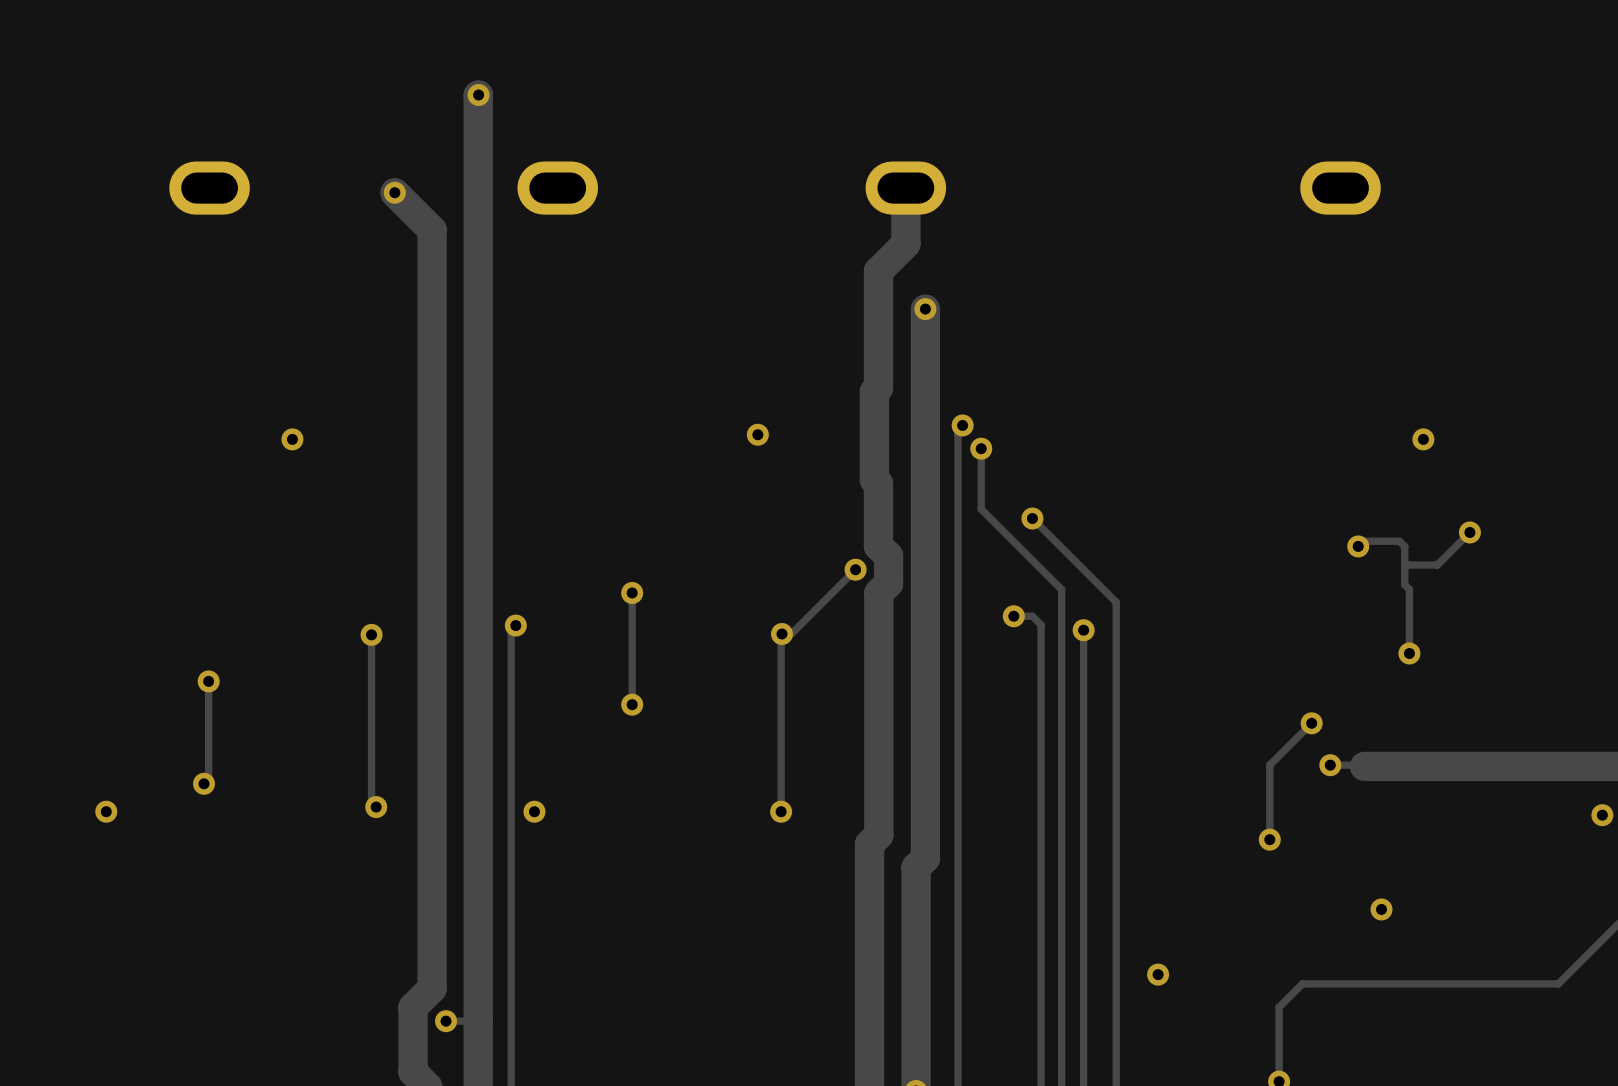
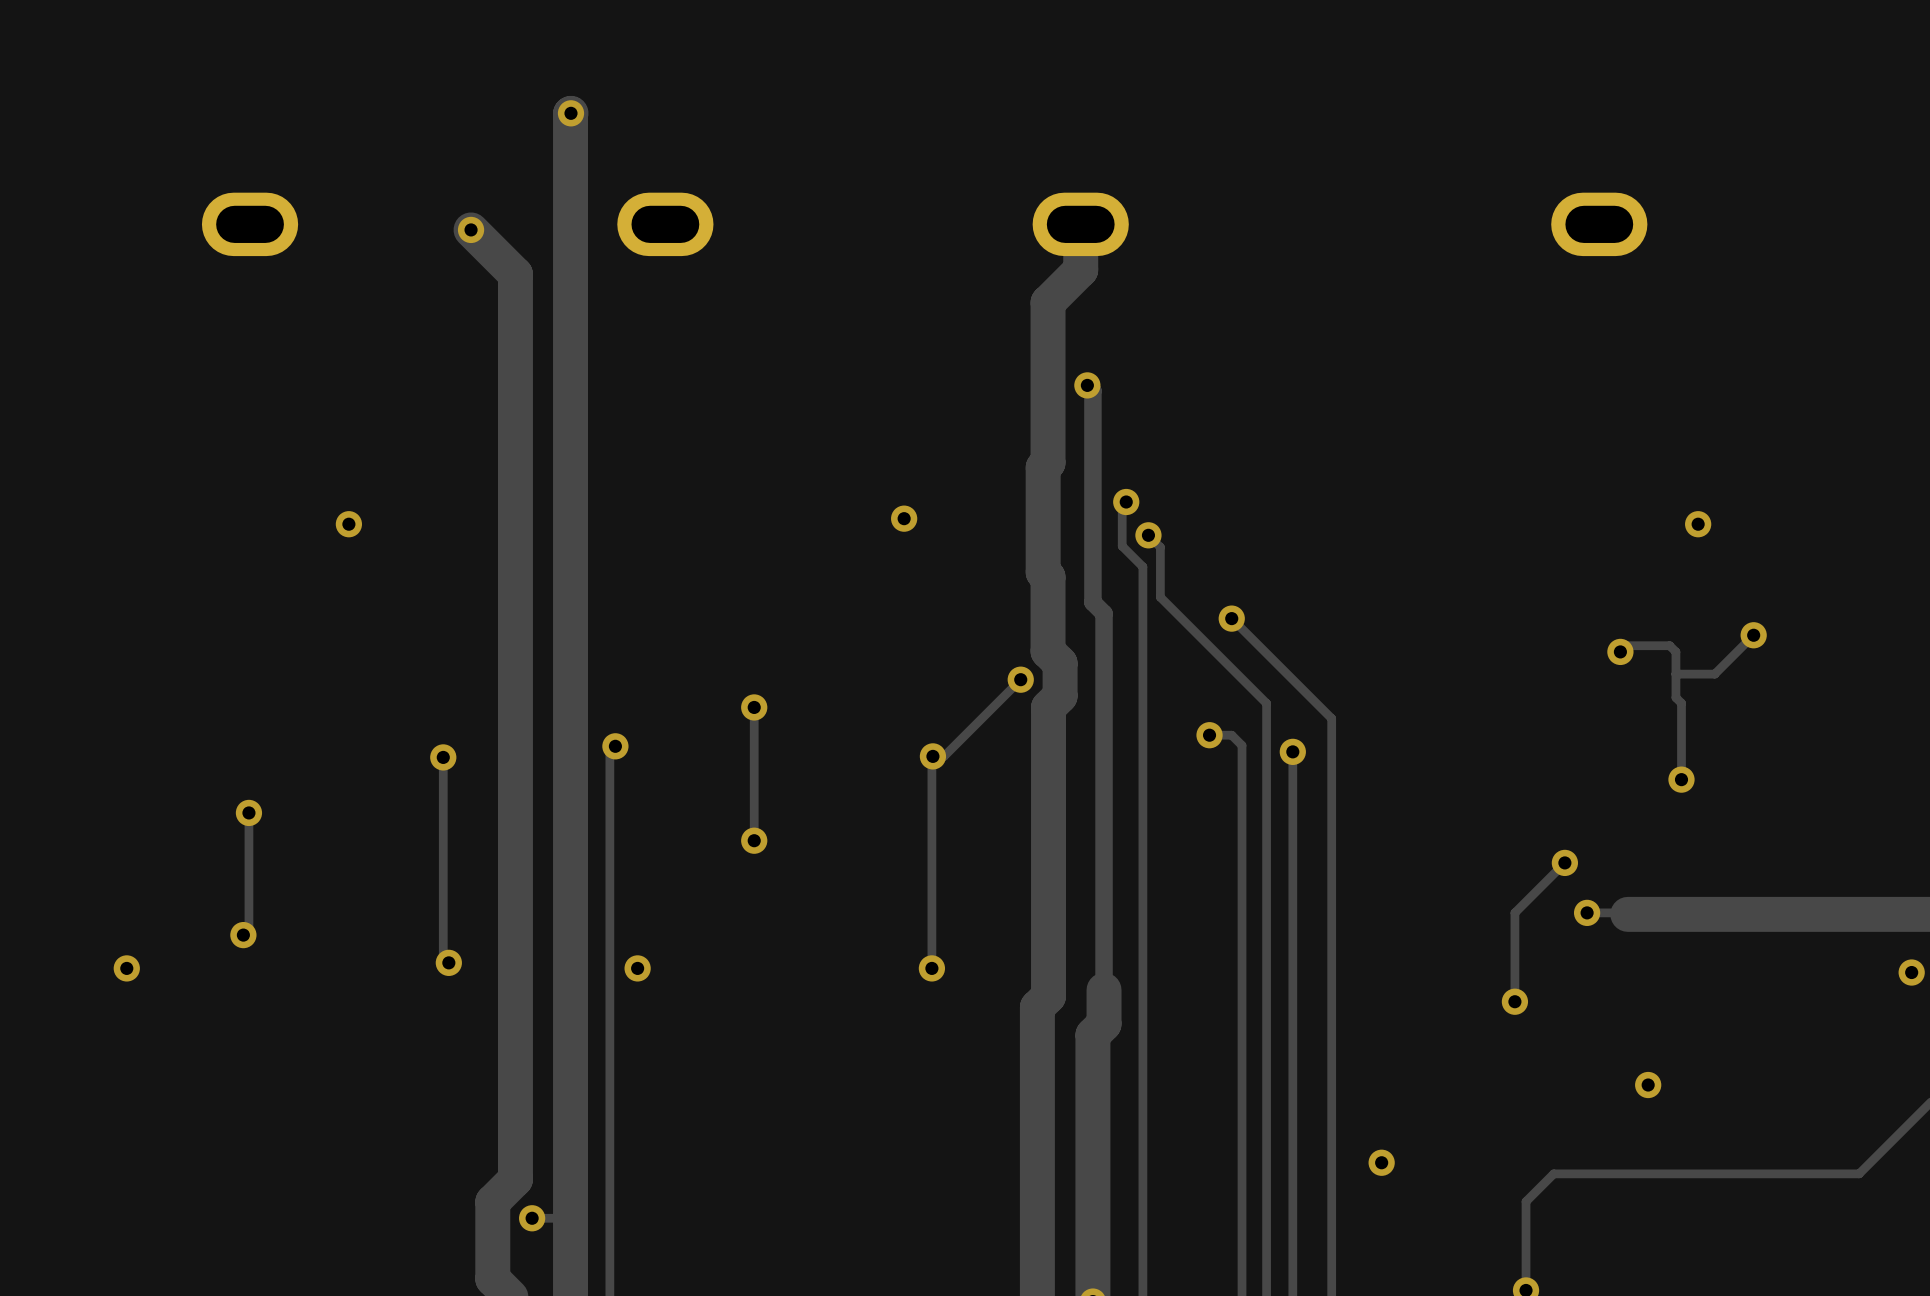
track: (905, 226) (905, 243) (878, 271) -> (1080, 269) (1048, 302) (1048, 323)
track: (925, 309) (925, 514) -> (1087, 385) (1092, 390) (1092, 602) (1104, 613)
via position: (925, 309) -> (1087, 385)
track: (962, 425) (962, 430) (957, 434) (957, 475) -> (1126, 502) (1122, 506) (1122, 546) (1142, 566)
via position: (962, 425) -> (1126, 502)
track: (981, 448) (981, 509) -> (1148, 535) (1160, 547) (1160, 597) (1170, 607)
via position: (981, 448) -> (1148, 535)
track width: thick (925, 514) (925, 829) -> thin (1104, 613) (1104, 990)

